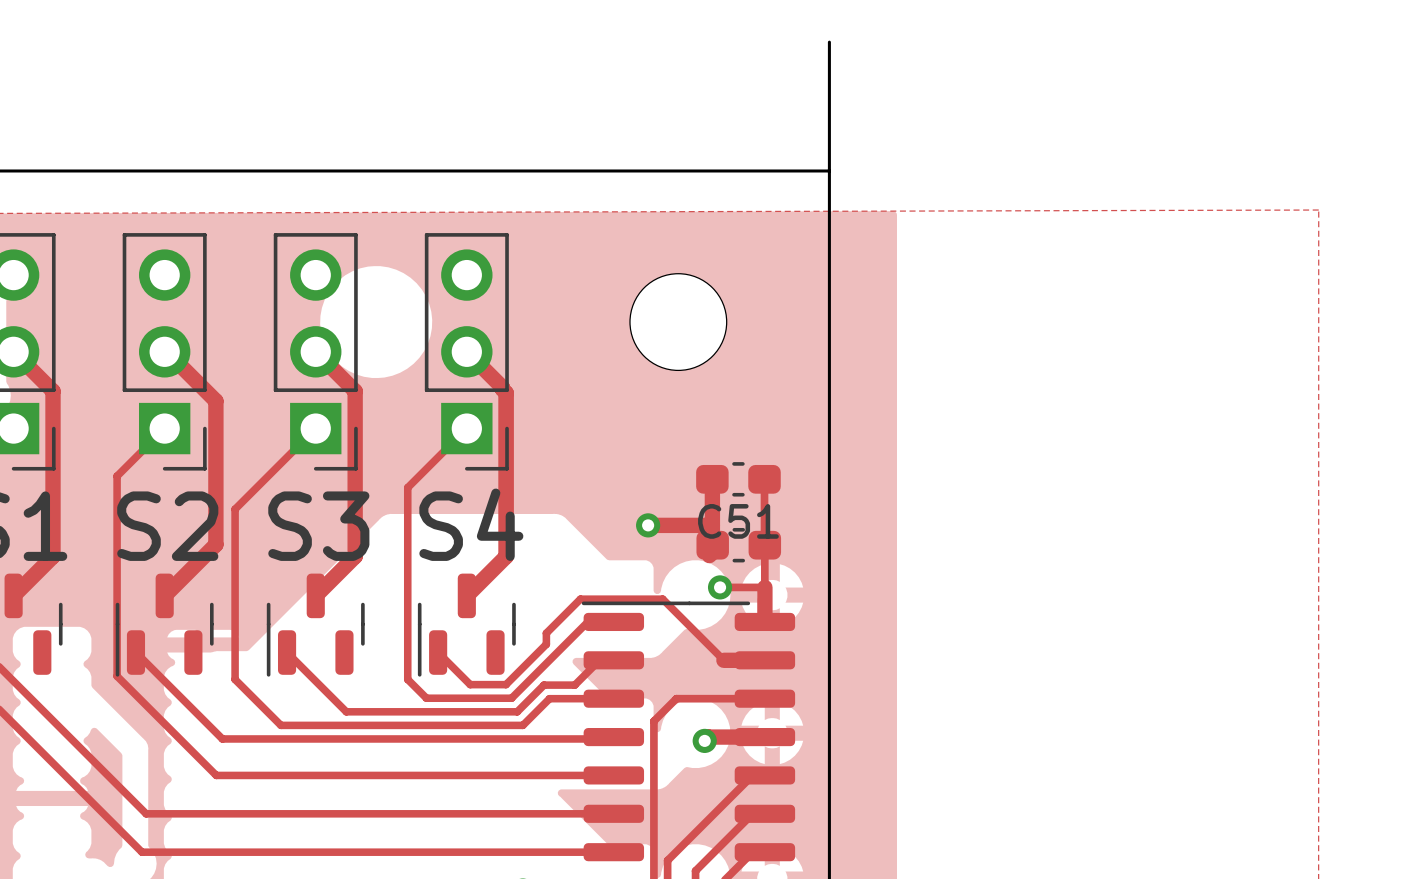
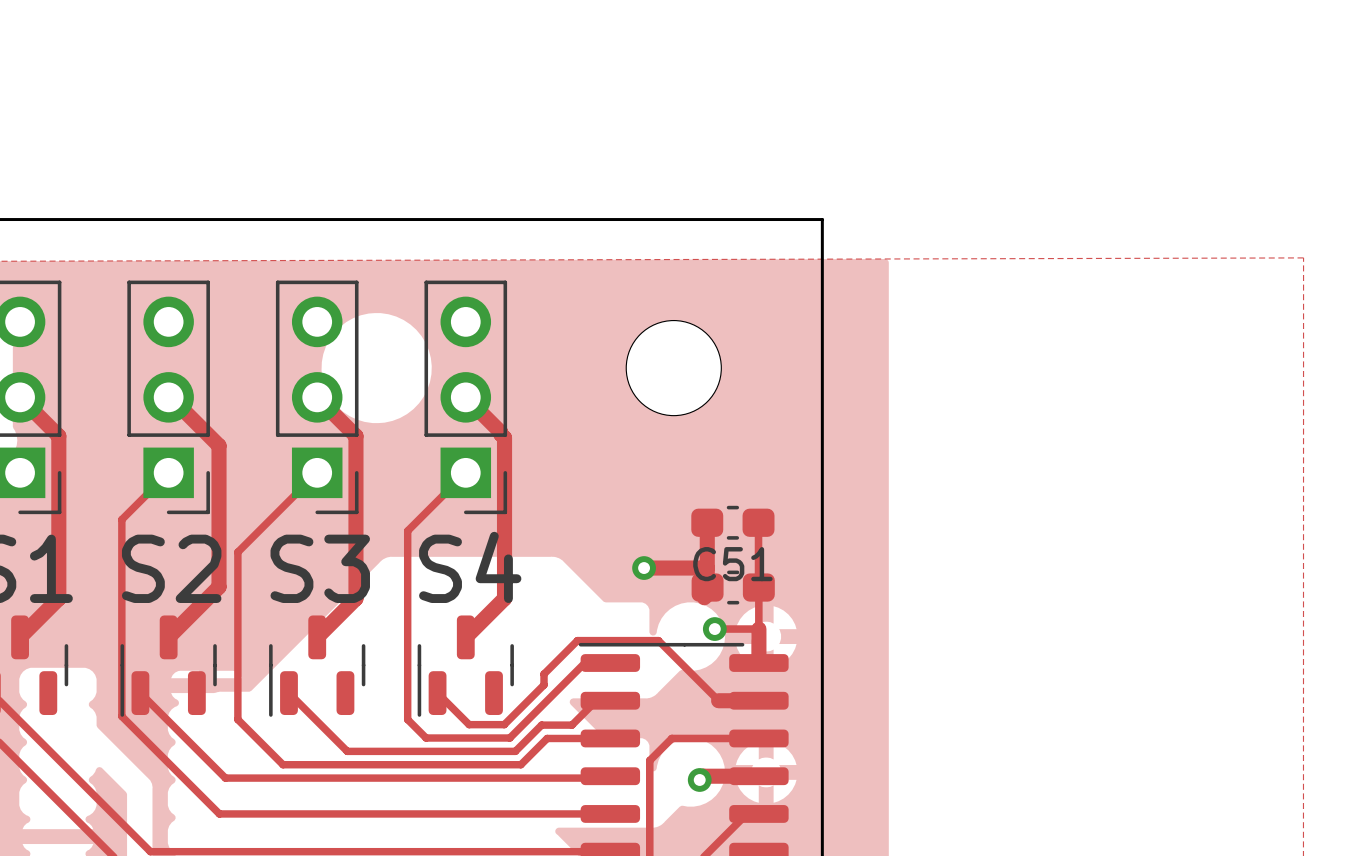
board edge: (829, 42) (829, 170) -> none

